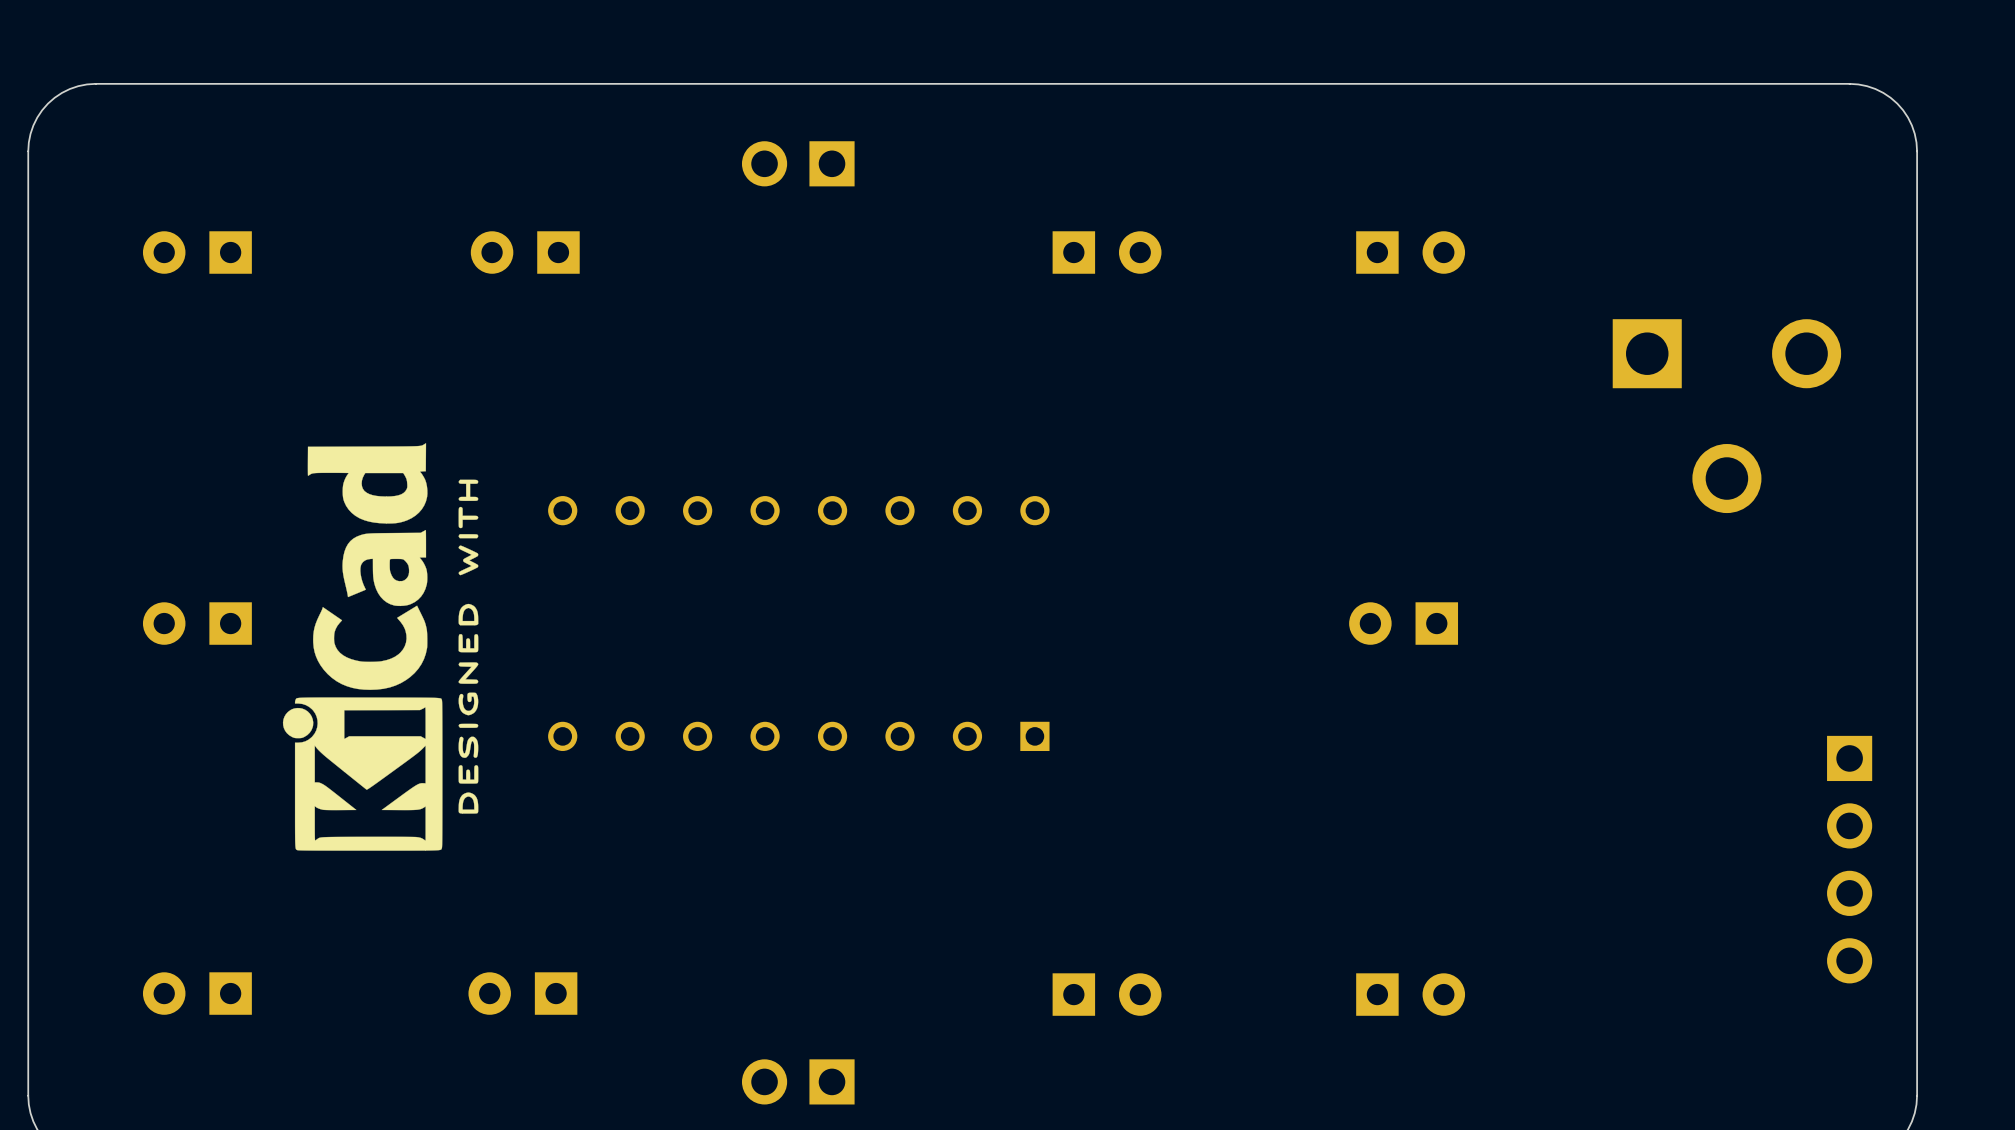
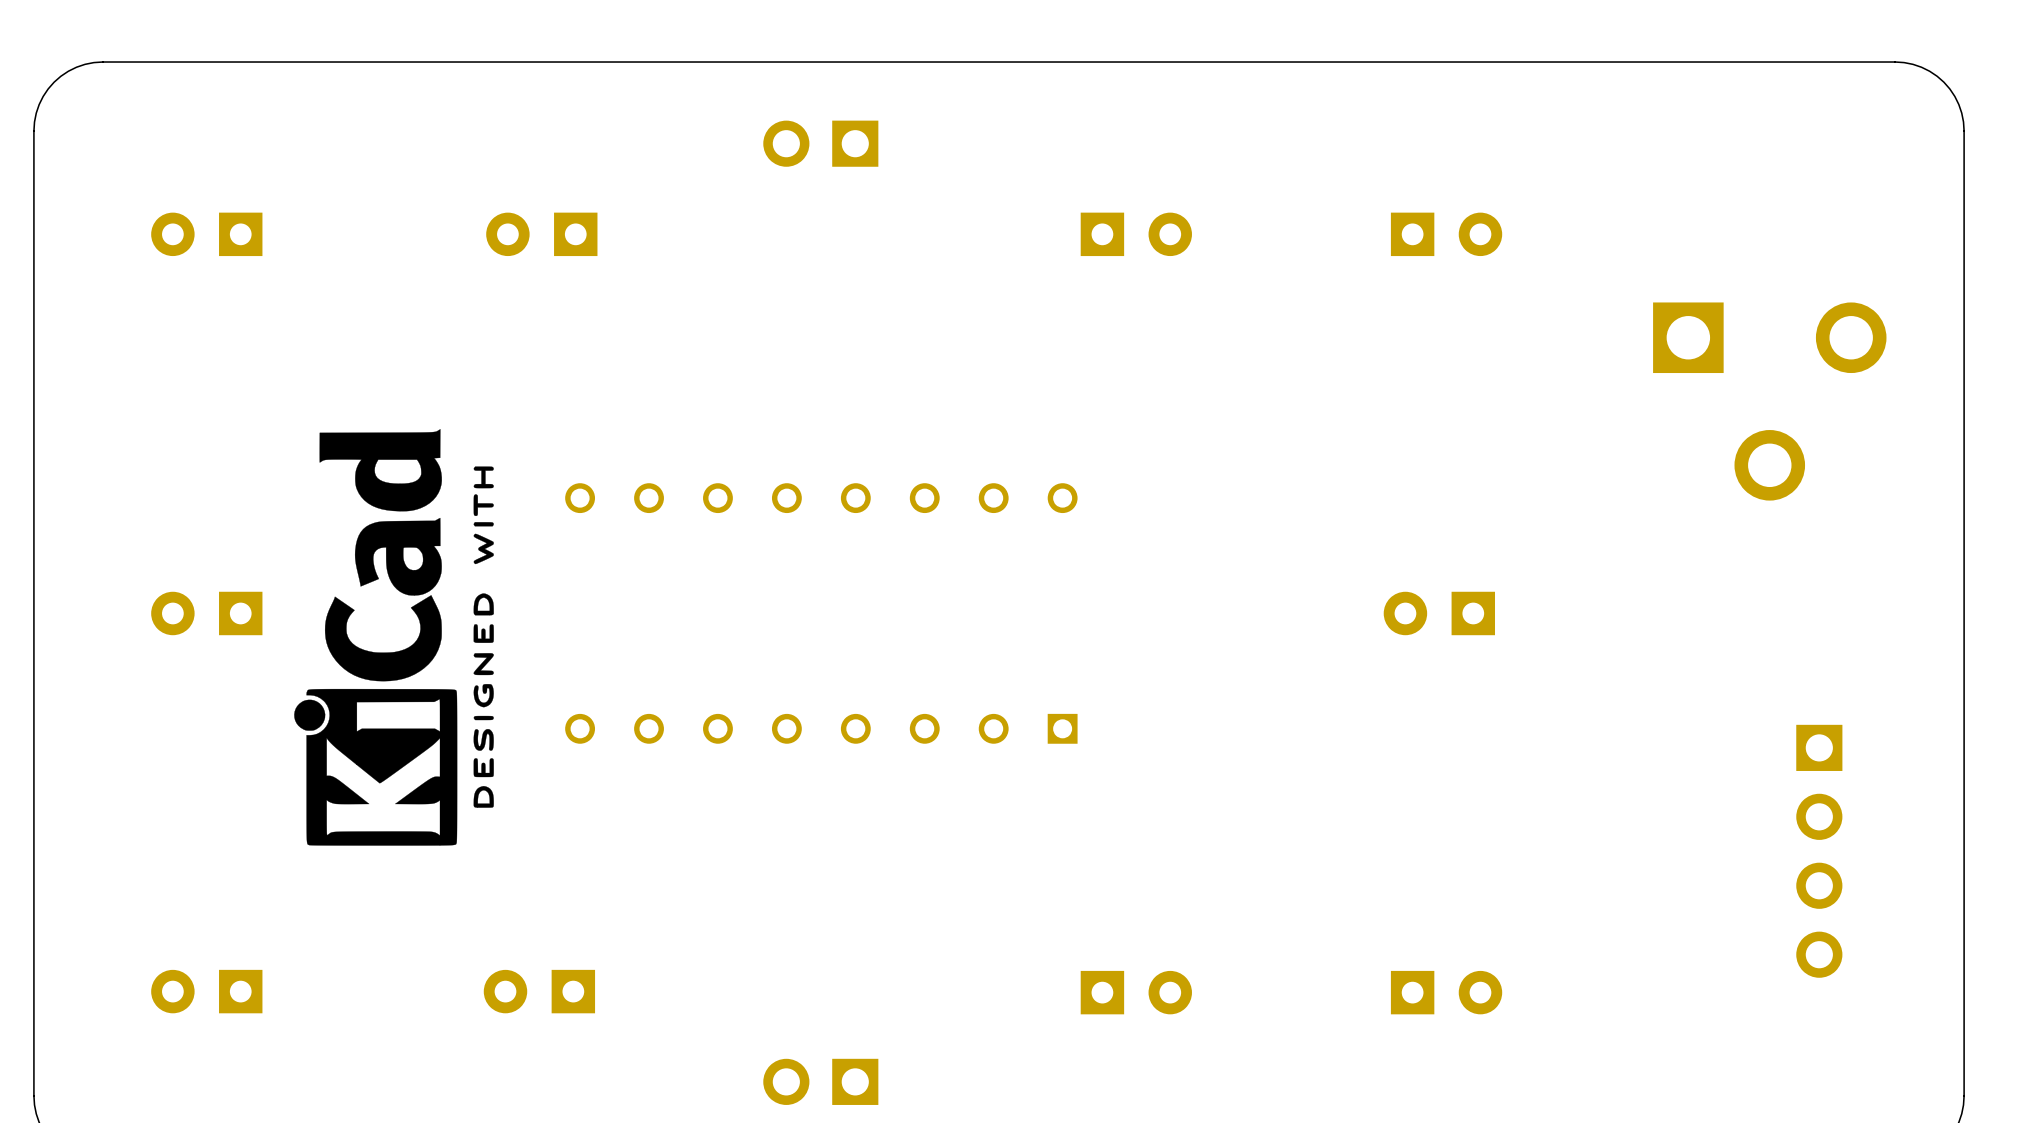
part position: (1849, 859) -> (1819, 851)

